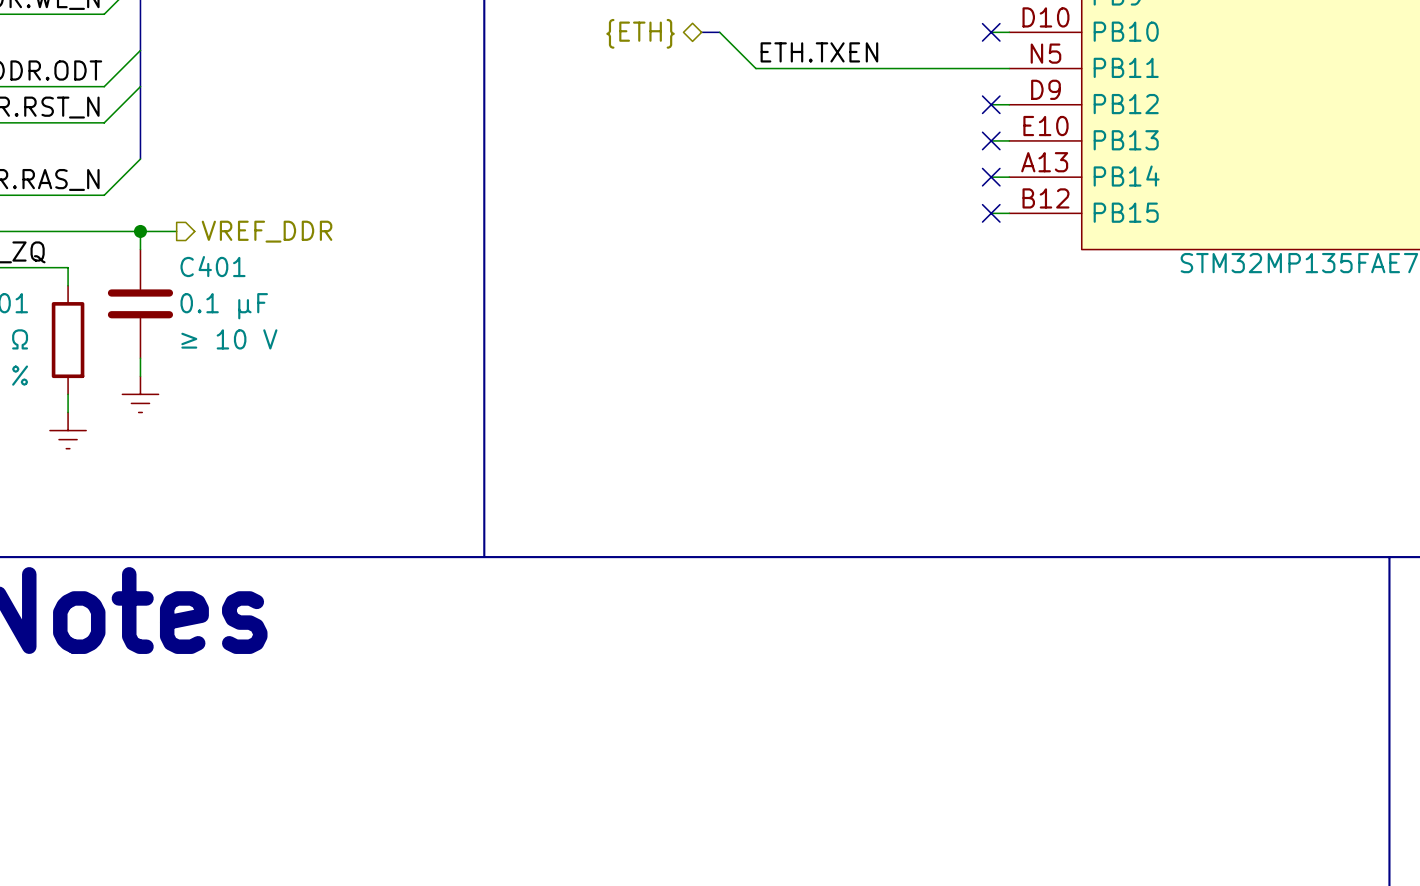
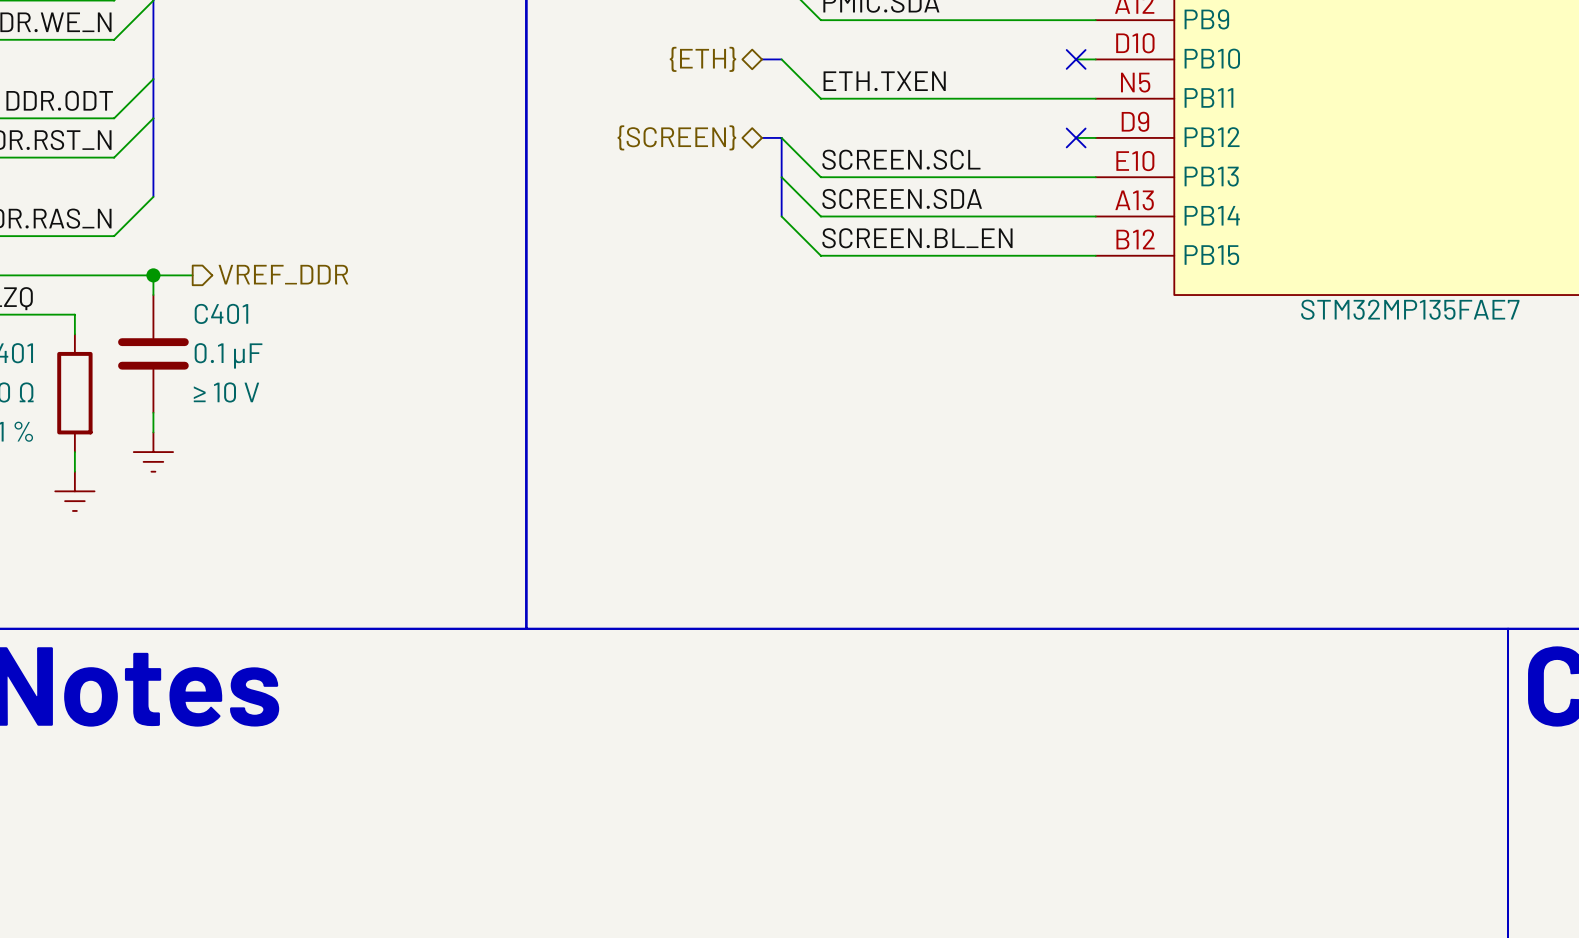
bus: none -> (762, 137) (781, 137) (781, 216)
wire: none -> (781, 137) (820, 177) (1076, 177)
hierarchical label: none -> {SCREEN} (676, 137)
label: none -> SCREEN.SCL (901, 159)
wire: none -> (781, 177) (820, 216) (1076, 216)
no-connect mark: (991, 140) -> none
label: none -> SCREEN.SDA (902, 198)
wire: none -> (781, 216) (820, 255) (1076, 255)
no-connect mark: (991, 177) -> none
label: none -> SCREEN.BL_EN (917, 238)
no-connect mark: (991, 213) -> none

